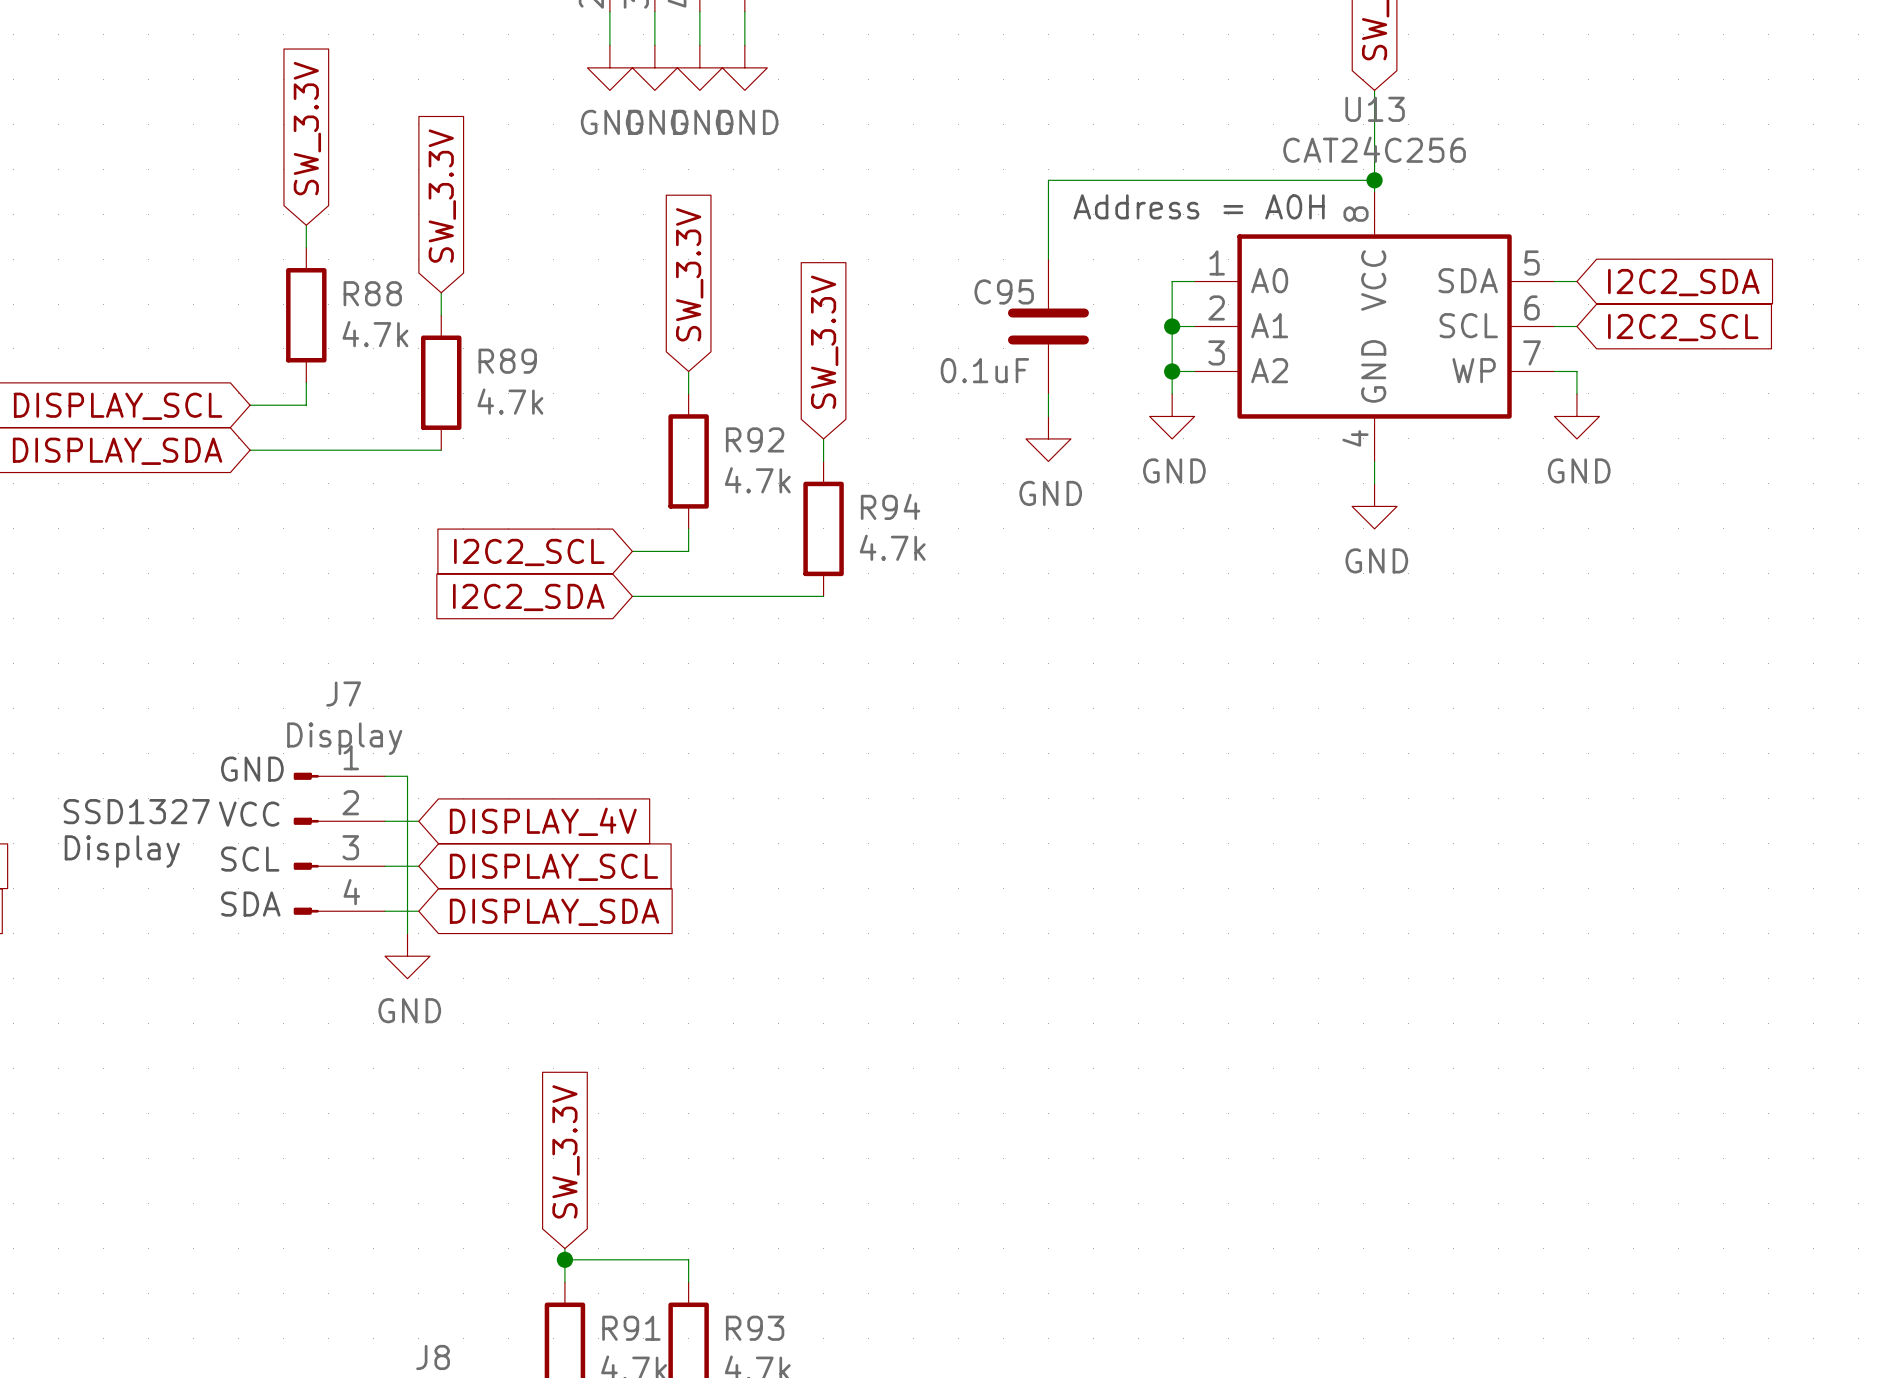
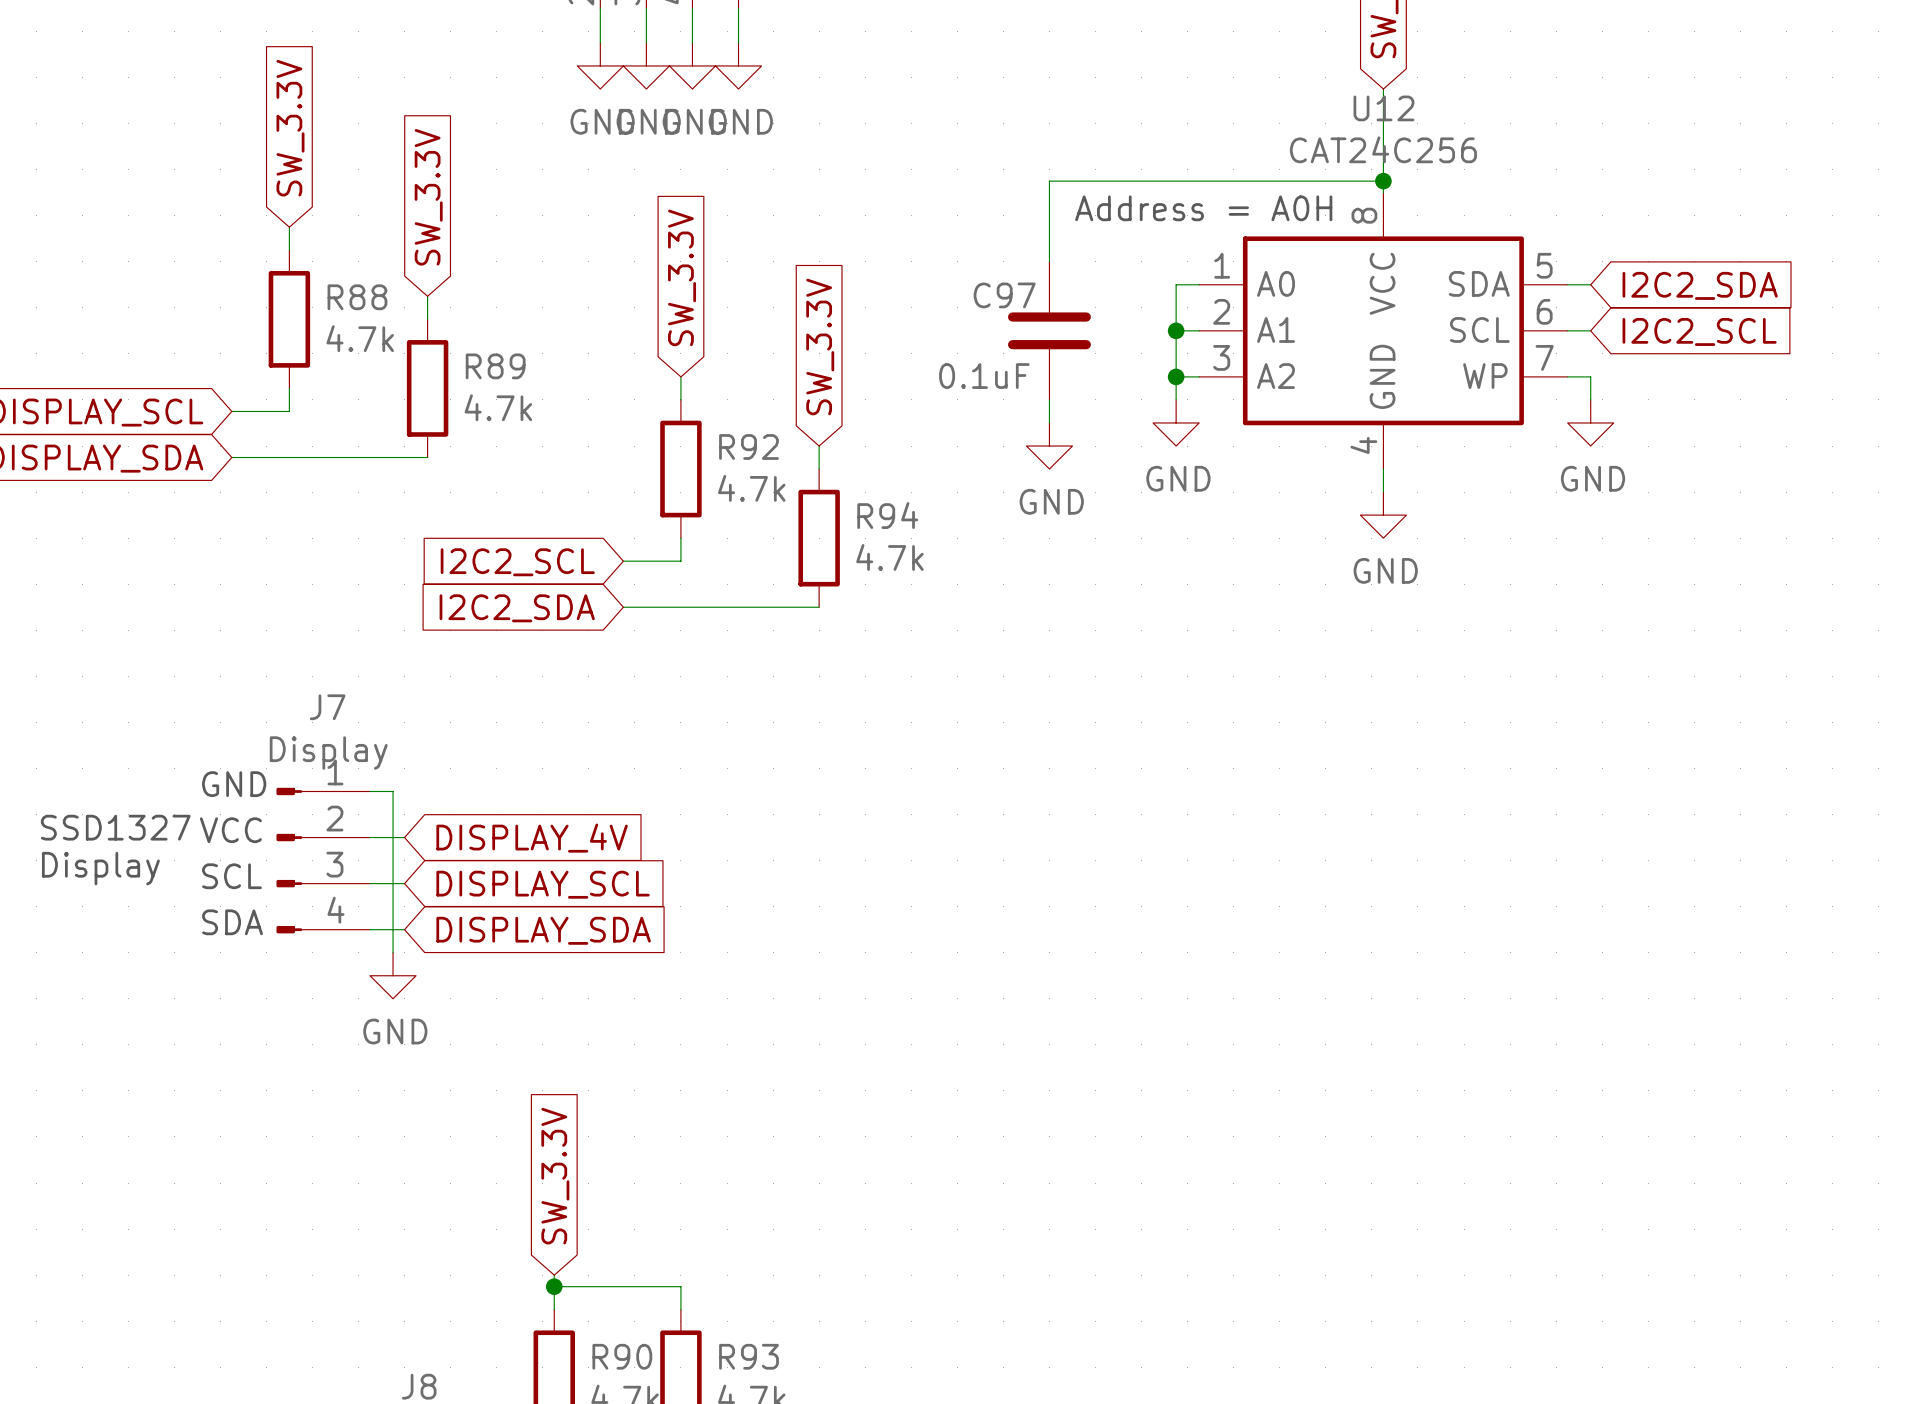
U13 name: U13 (1375, 109) -> U12 (1383, 108)
C95 name: C95 (1004, 291) -> C97 (1004, 295)
R91 name: R91 (631, 1328) -> R90 (622, 1356)

